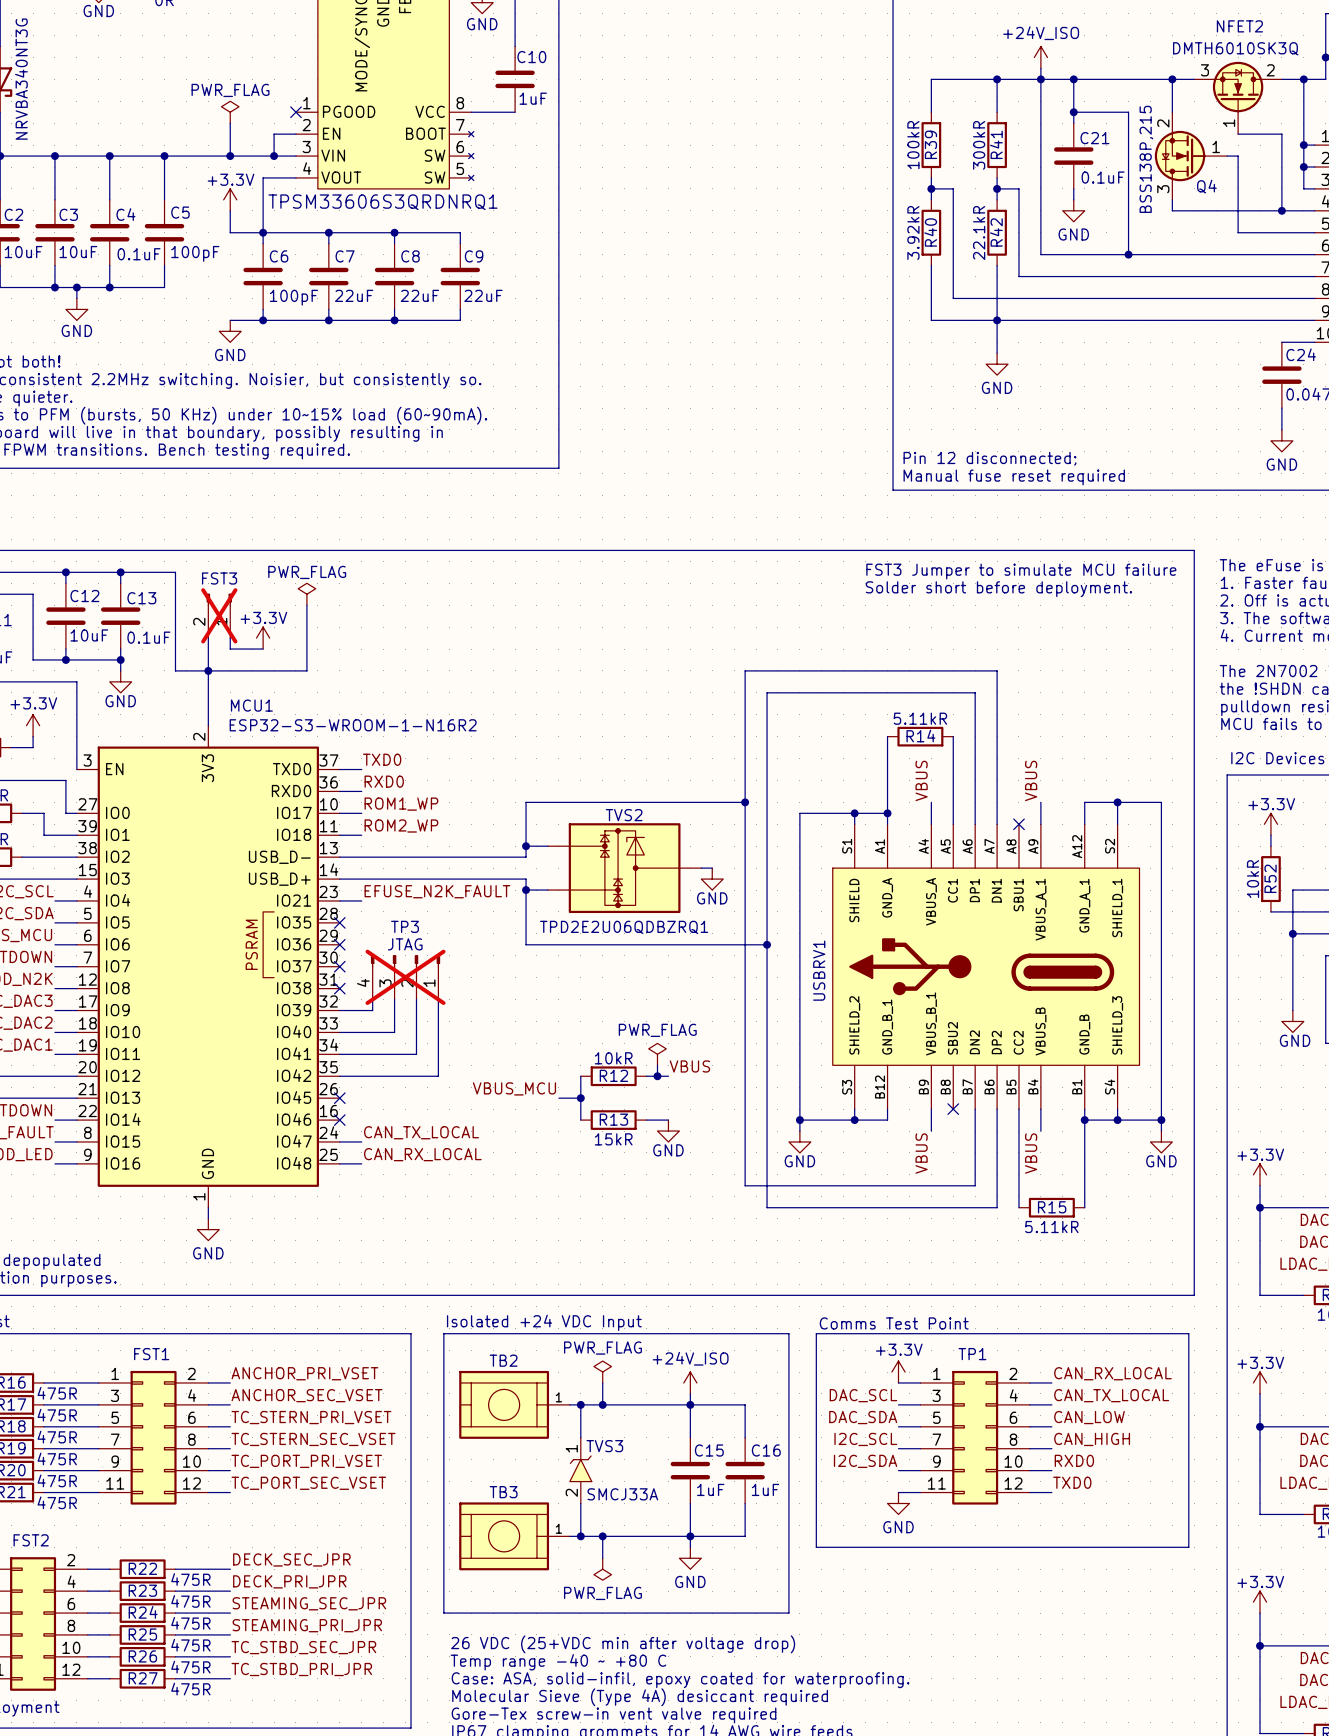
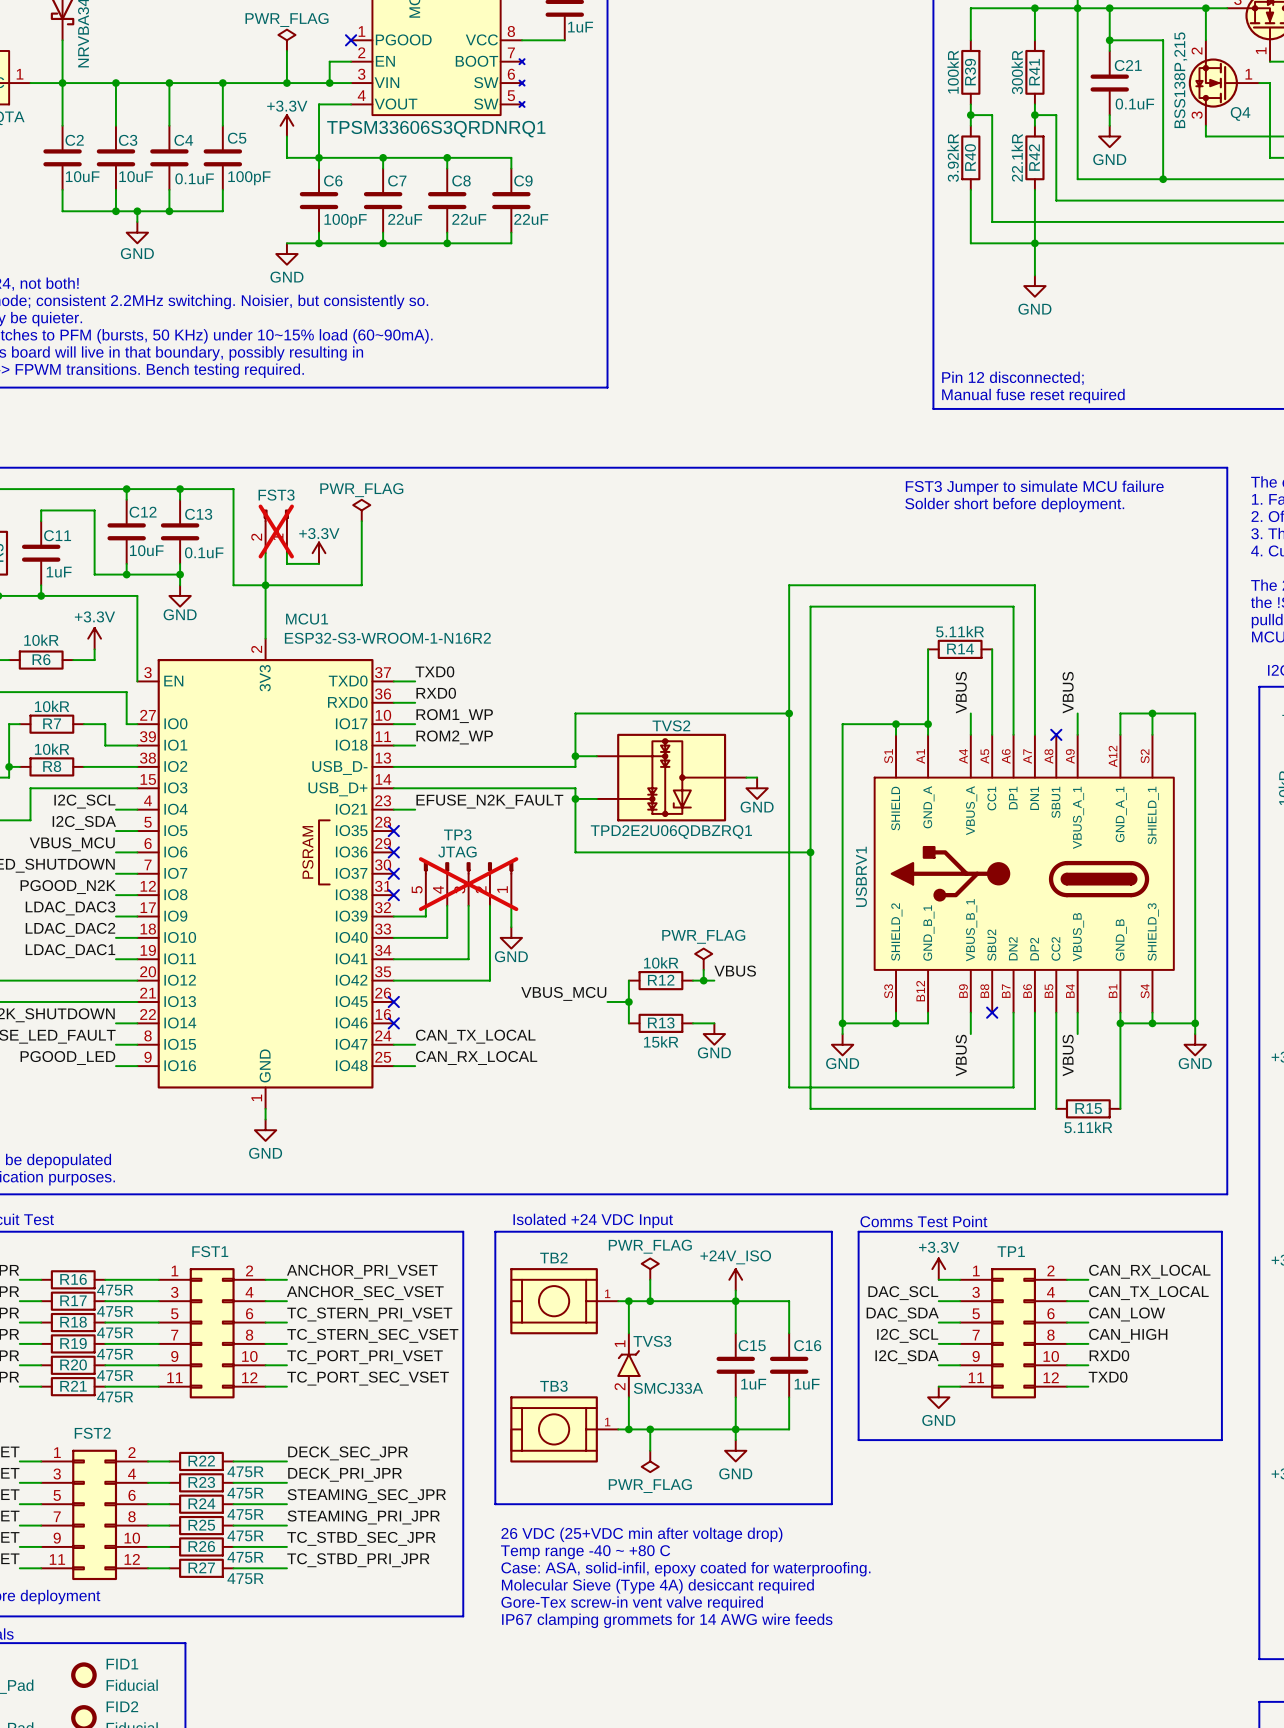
TVS2 flip: as is (624, 868) -> up-down (671, 777)
TP3 symbol: [370, 955, 441, 1000] -> [424, 862, 514, 906]
wire: none -> (511, 905) (511, 927)
power symbol: none -> GND (511, 937)

